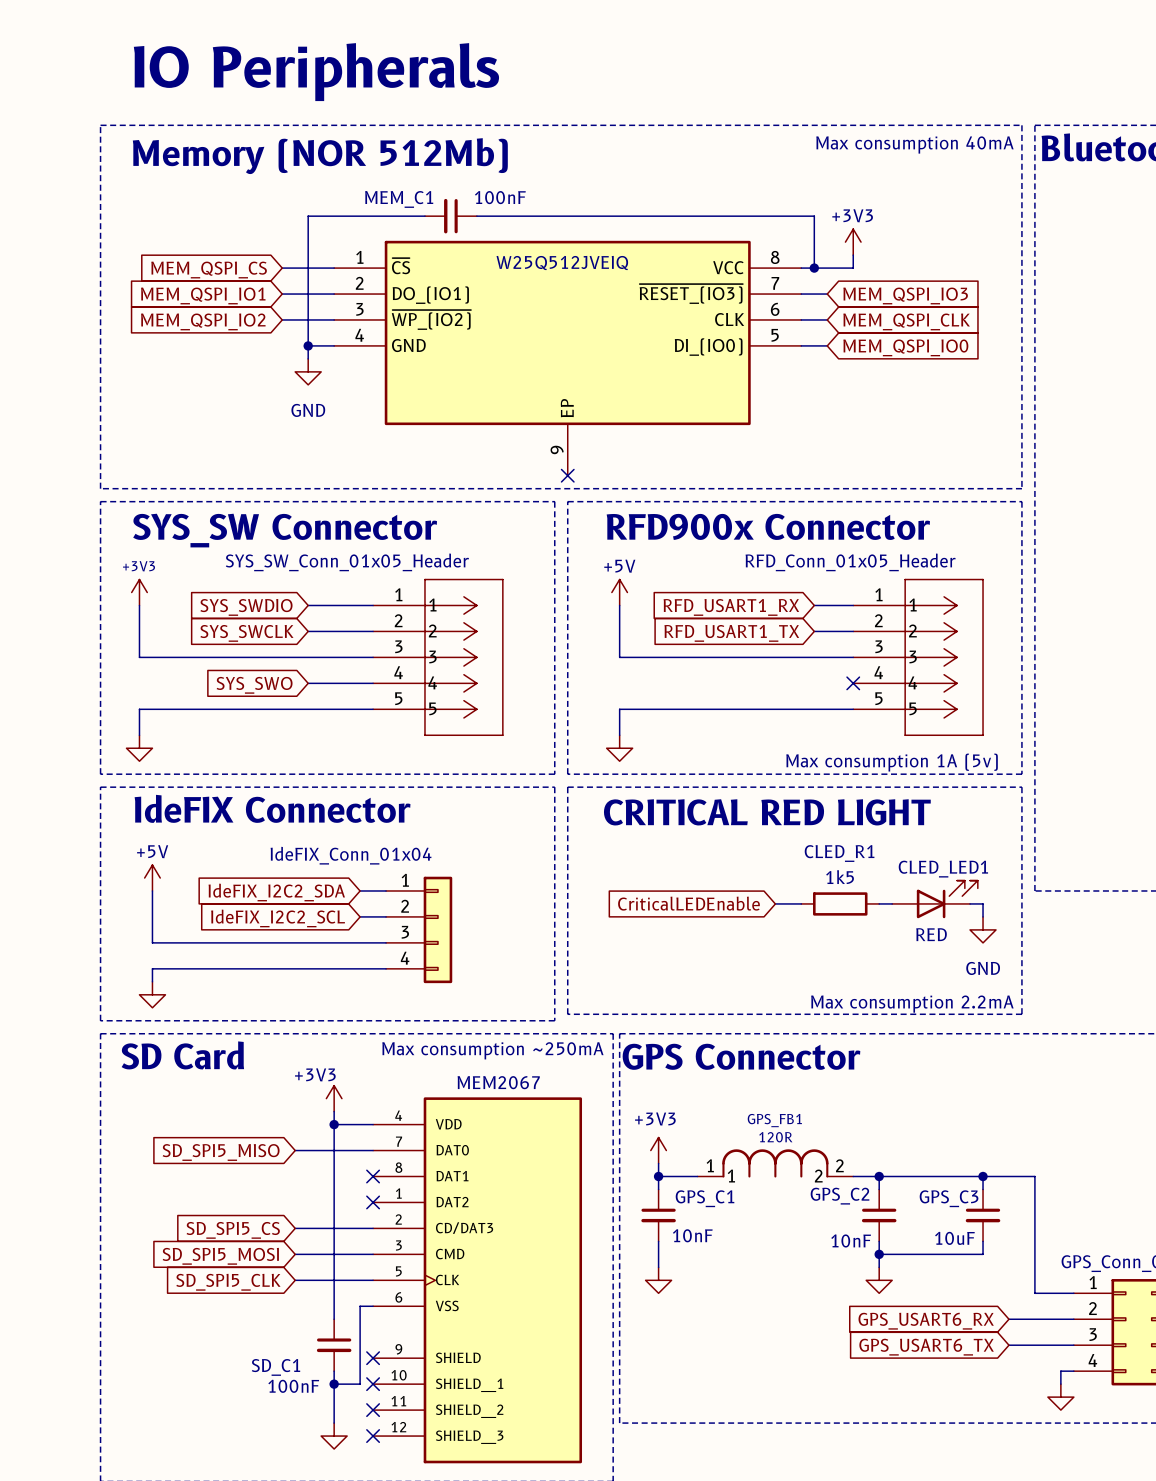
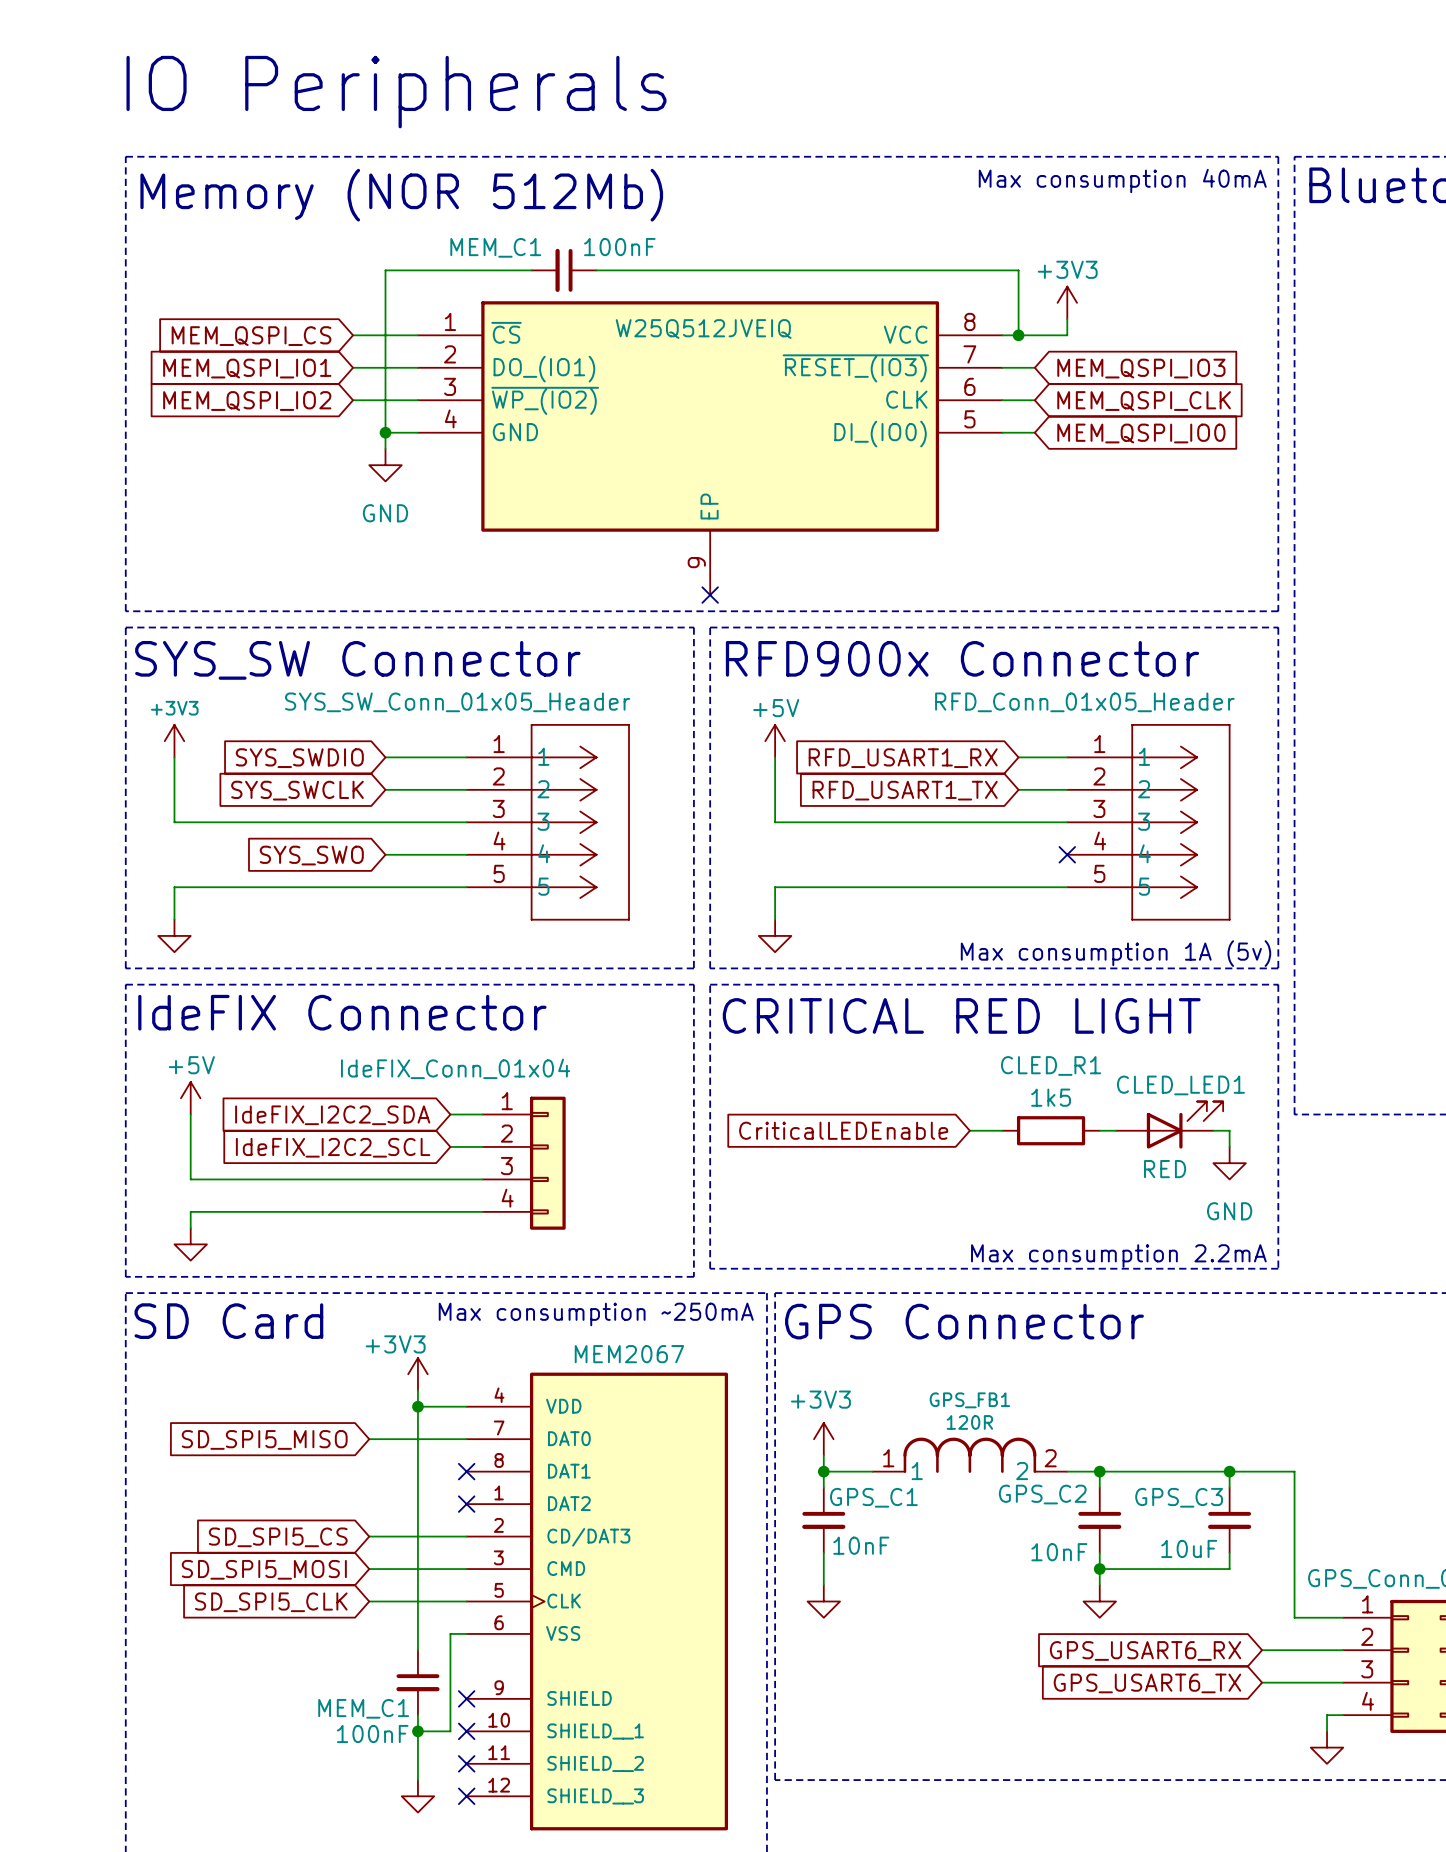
SD_C1 name: SD_C1 (275, 1367) -> MEM_C1 (363, 1708)

